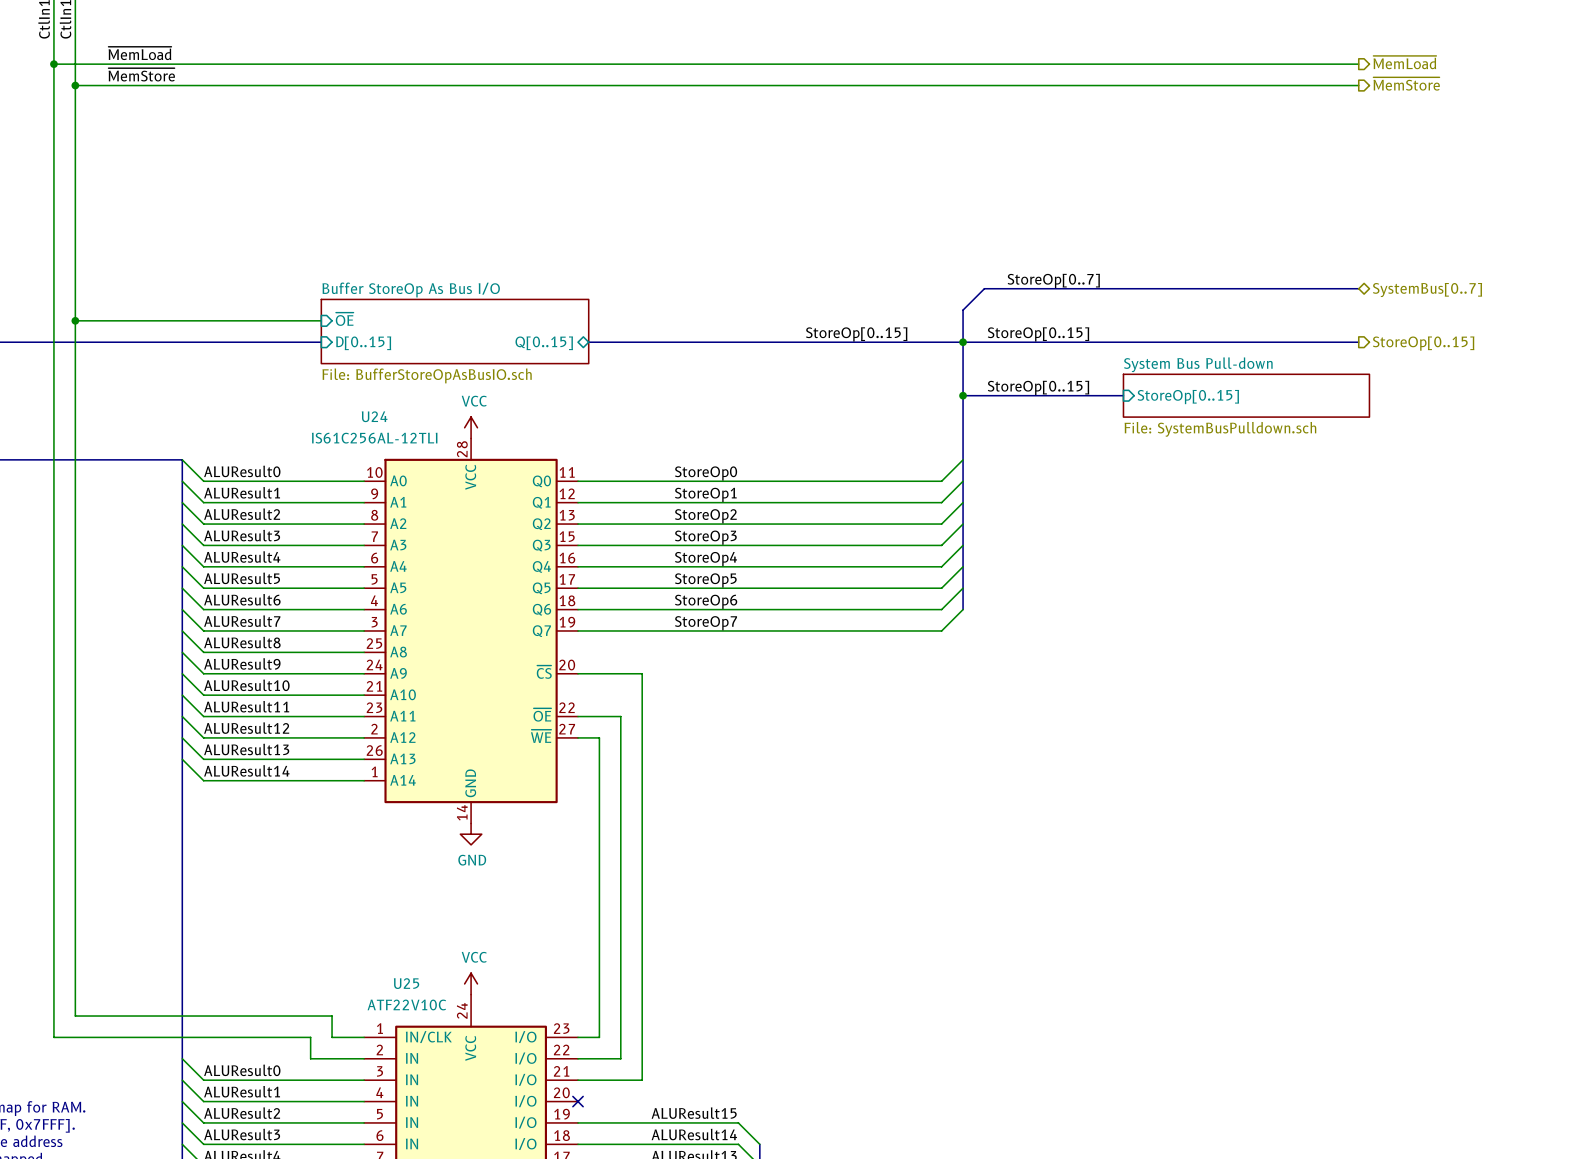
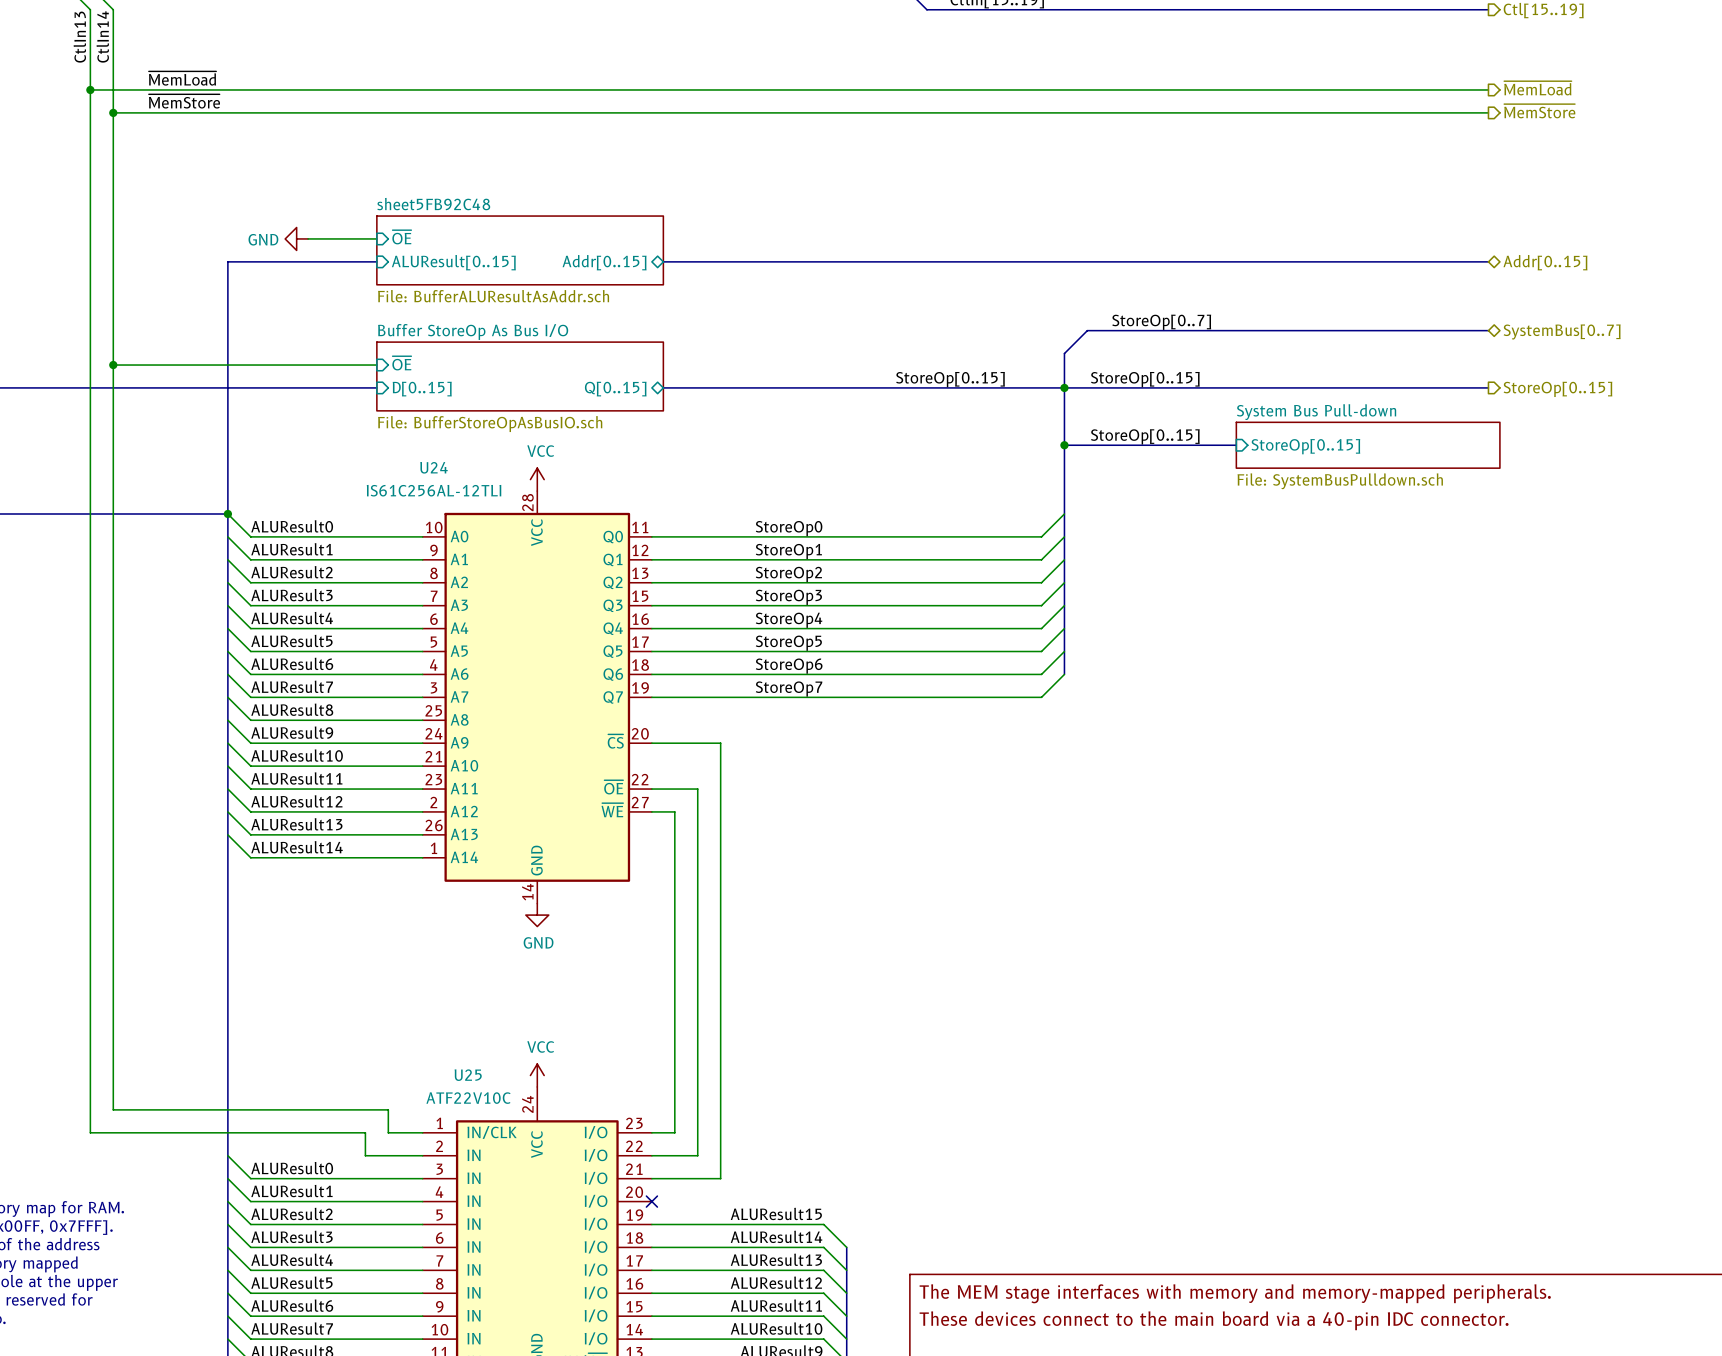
sheet pin: none -> ~{OE} (401, 237)
power symbol: none -> GND (296, 238)
wire: none -> (308, 238) (376, 238)
sheet sheet5FB92C48: none -> File: BufferALUResultAsAddr.sch (520, 250)
bus: none -> (376, 261) (227, 261) (227, 513)
bus: none -> (663, 261) (1488, 261)
sheet pin: none -> ALUResult[0..15] (453, 262)
sheet pin: none -> Addr[0..15] (604, 262)
hierarchical label: none -> Addr[0..15] (1545, 262)
junction: none -> (227, 513)

